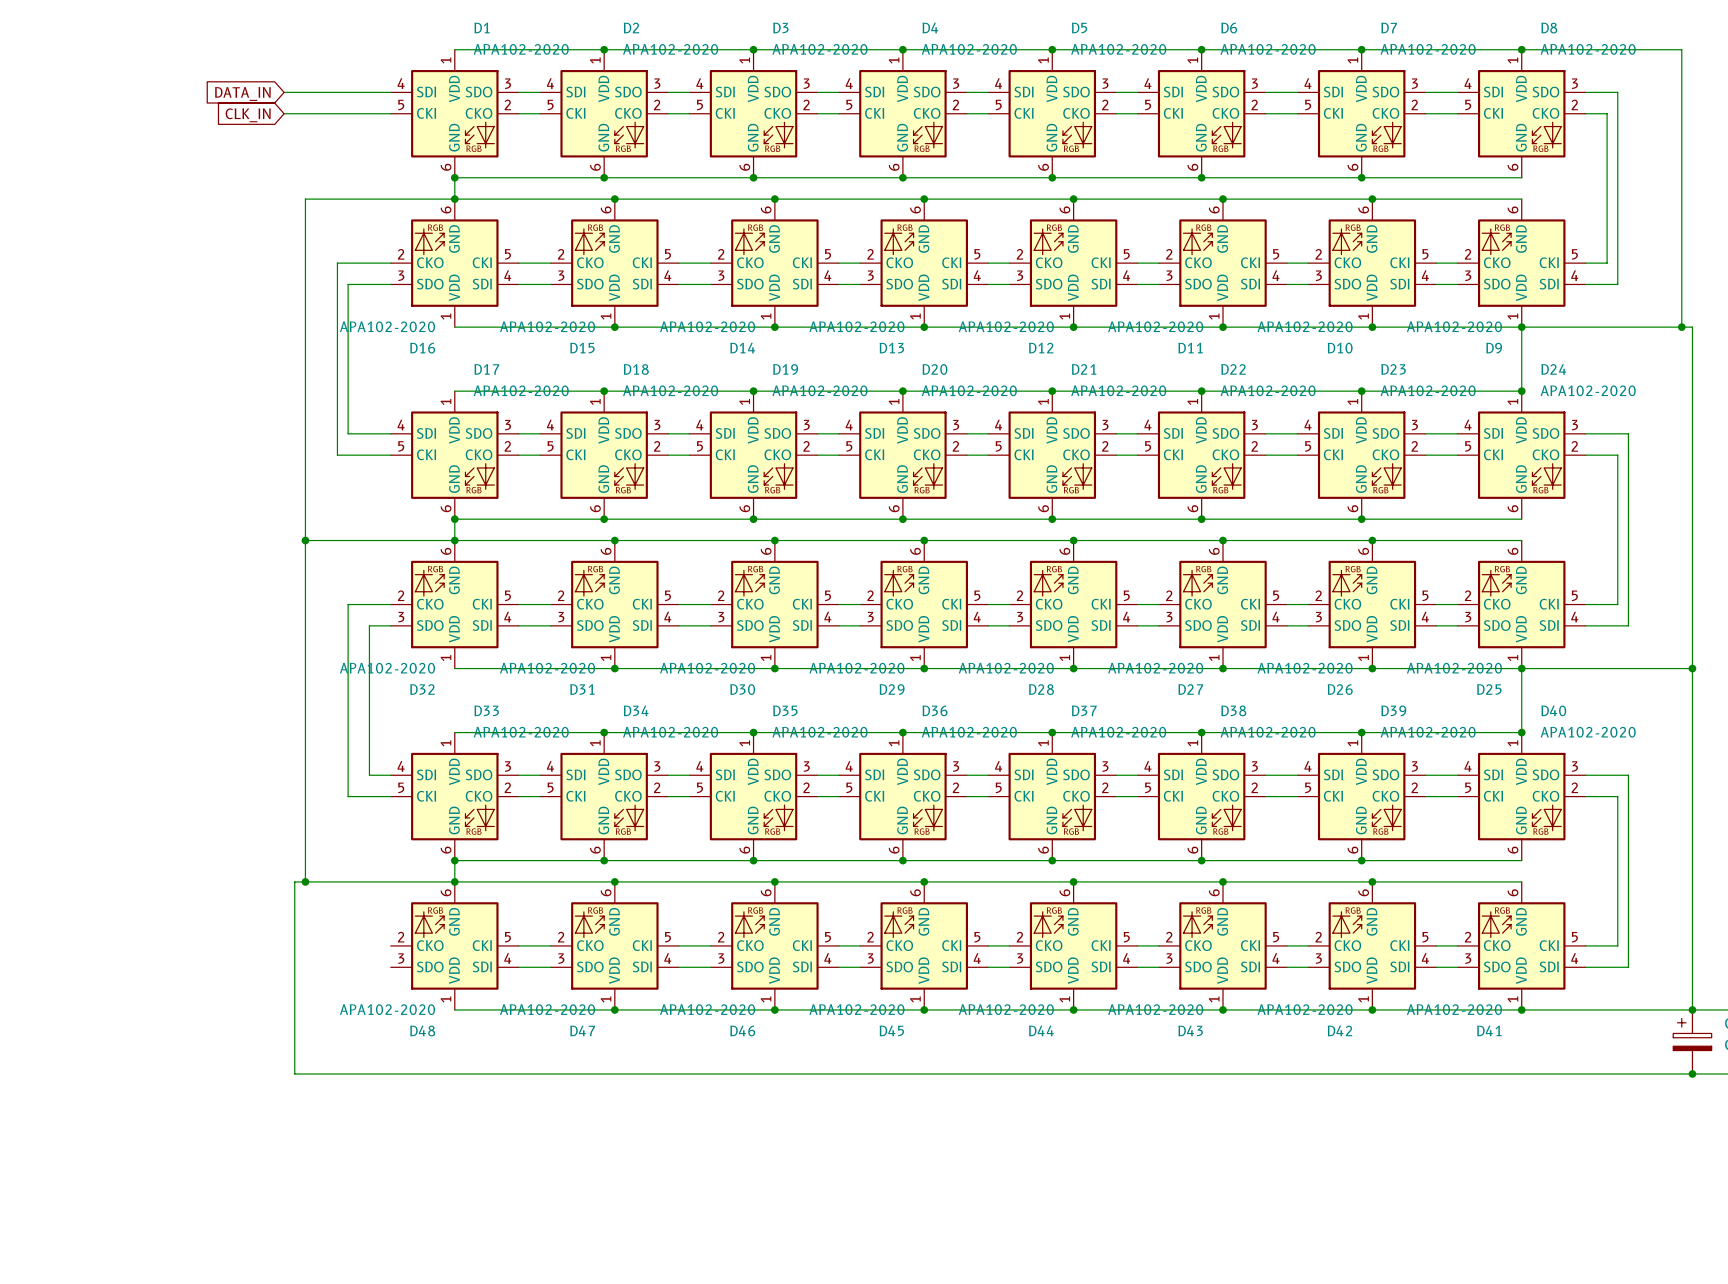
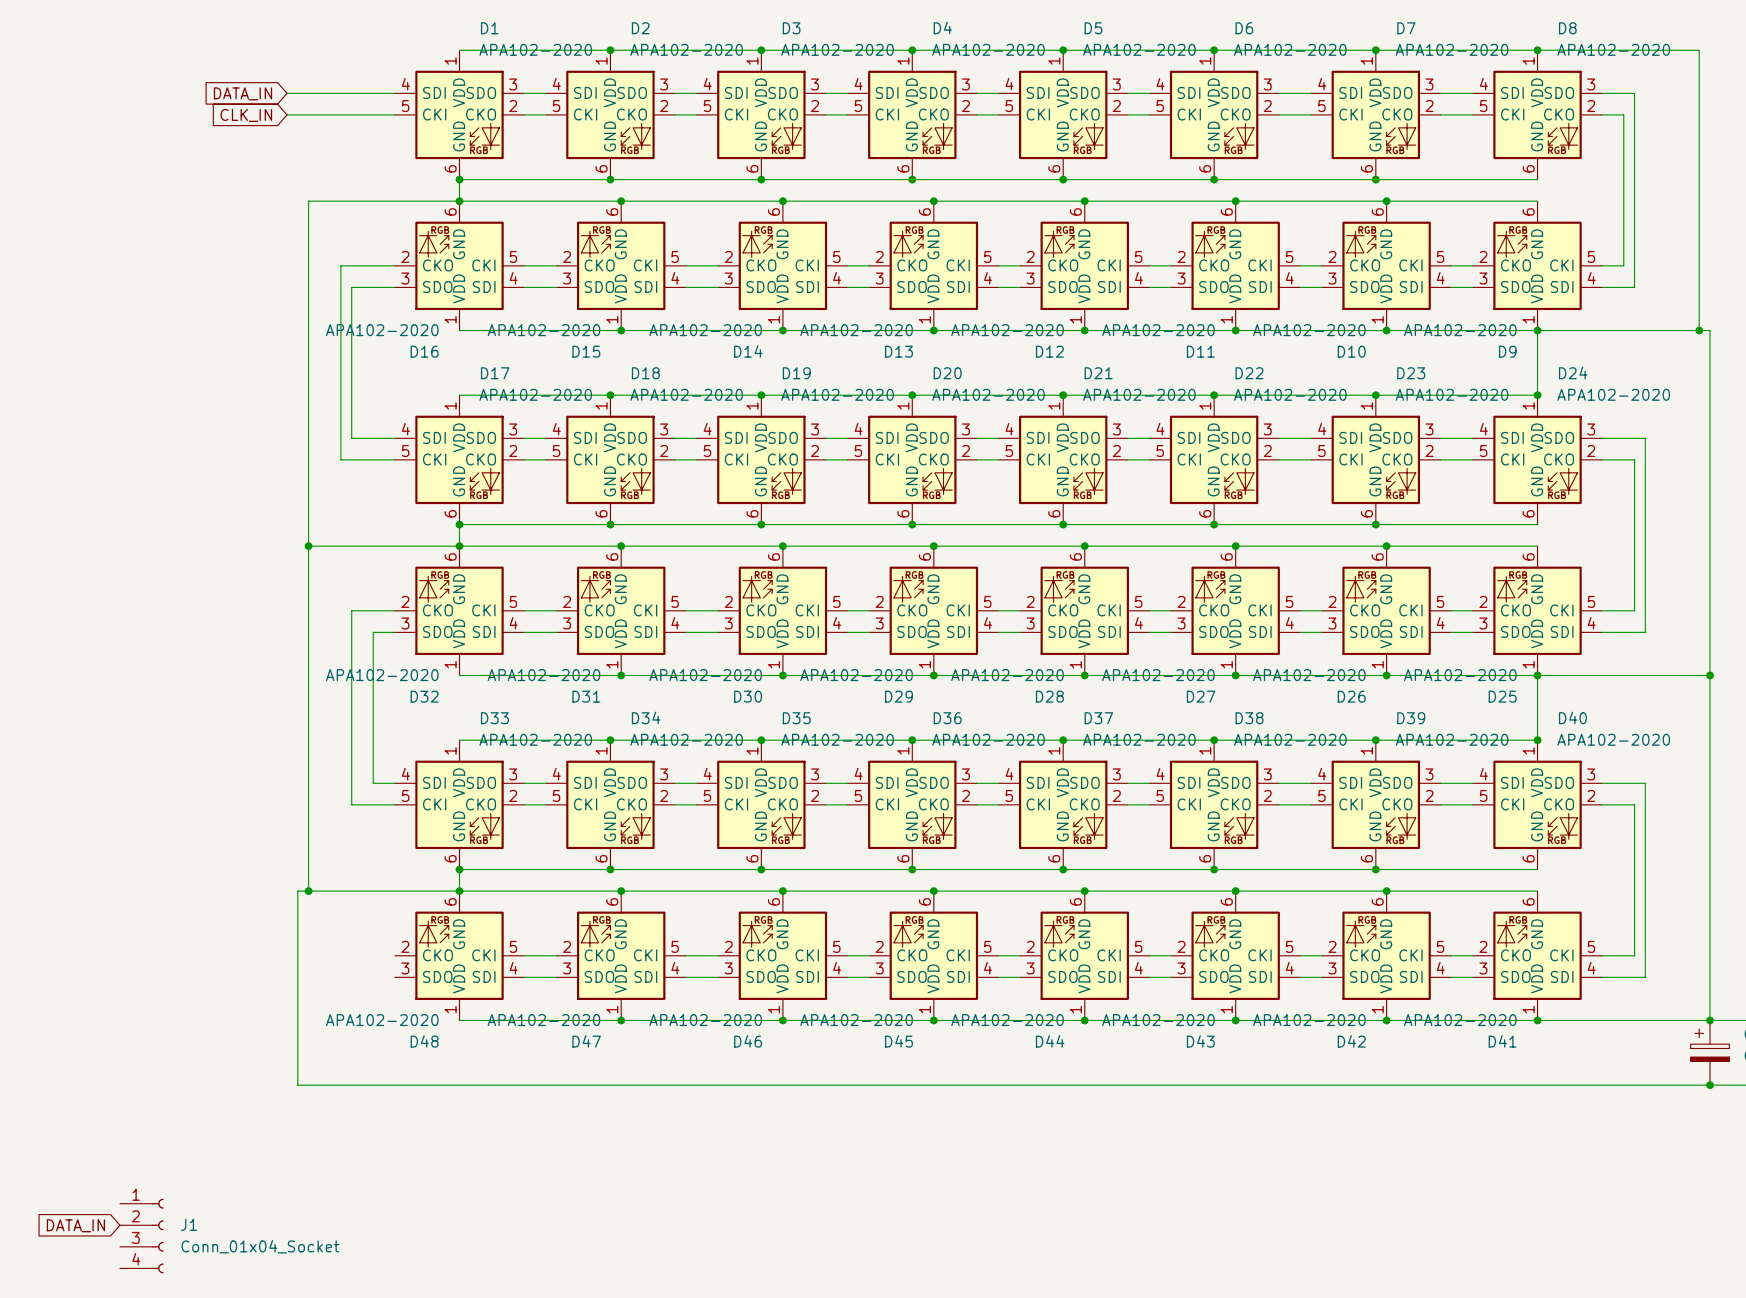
global label: none -> DATA_IN (75, 1225)
J1: none -> Conn_01x04_Socket (141, 1236)

